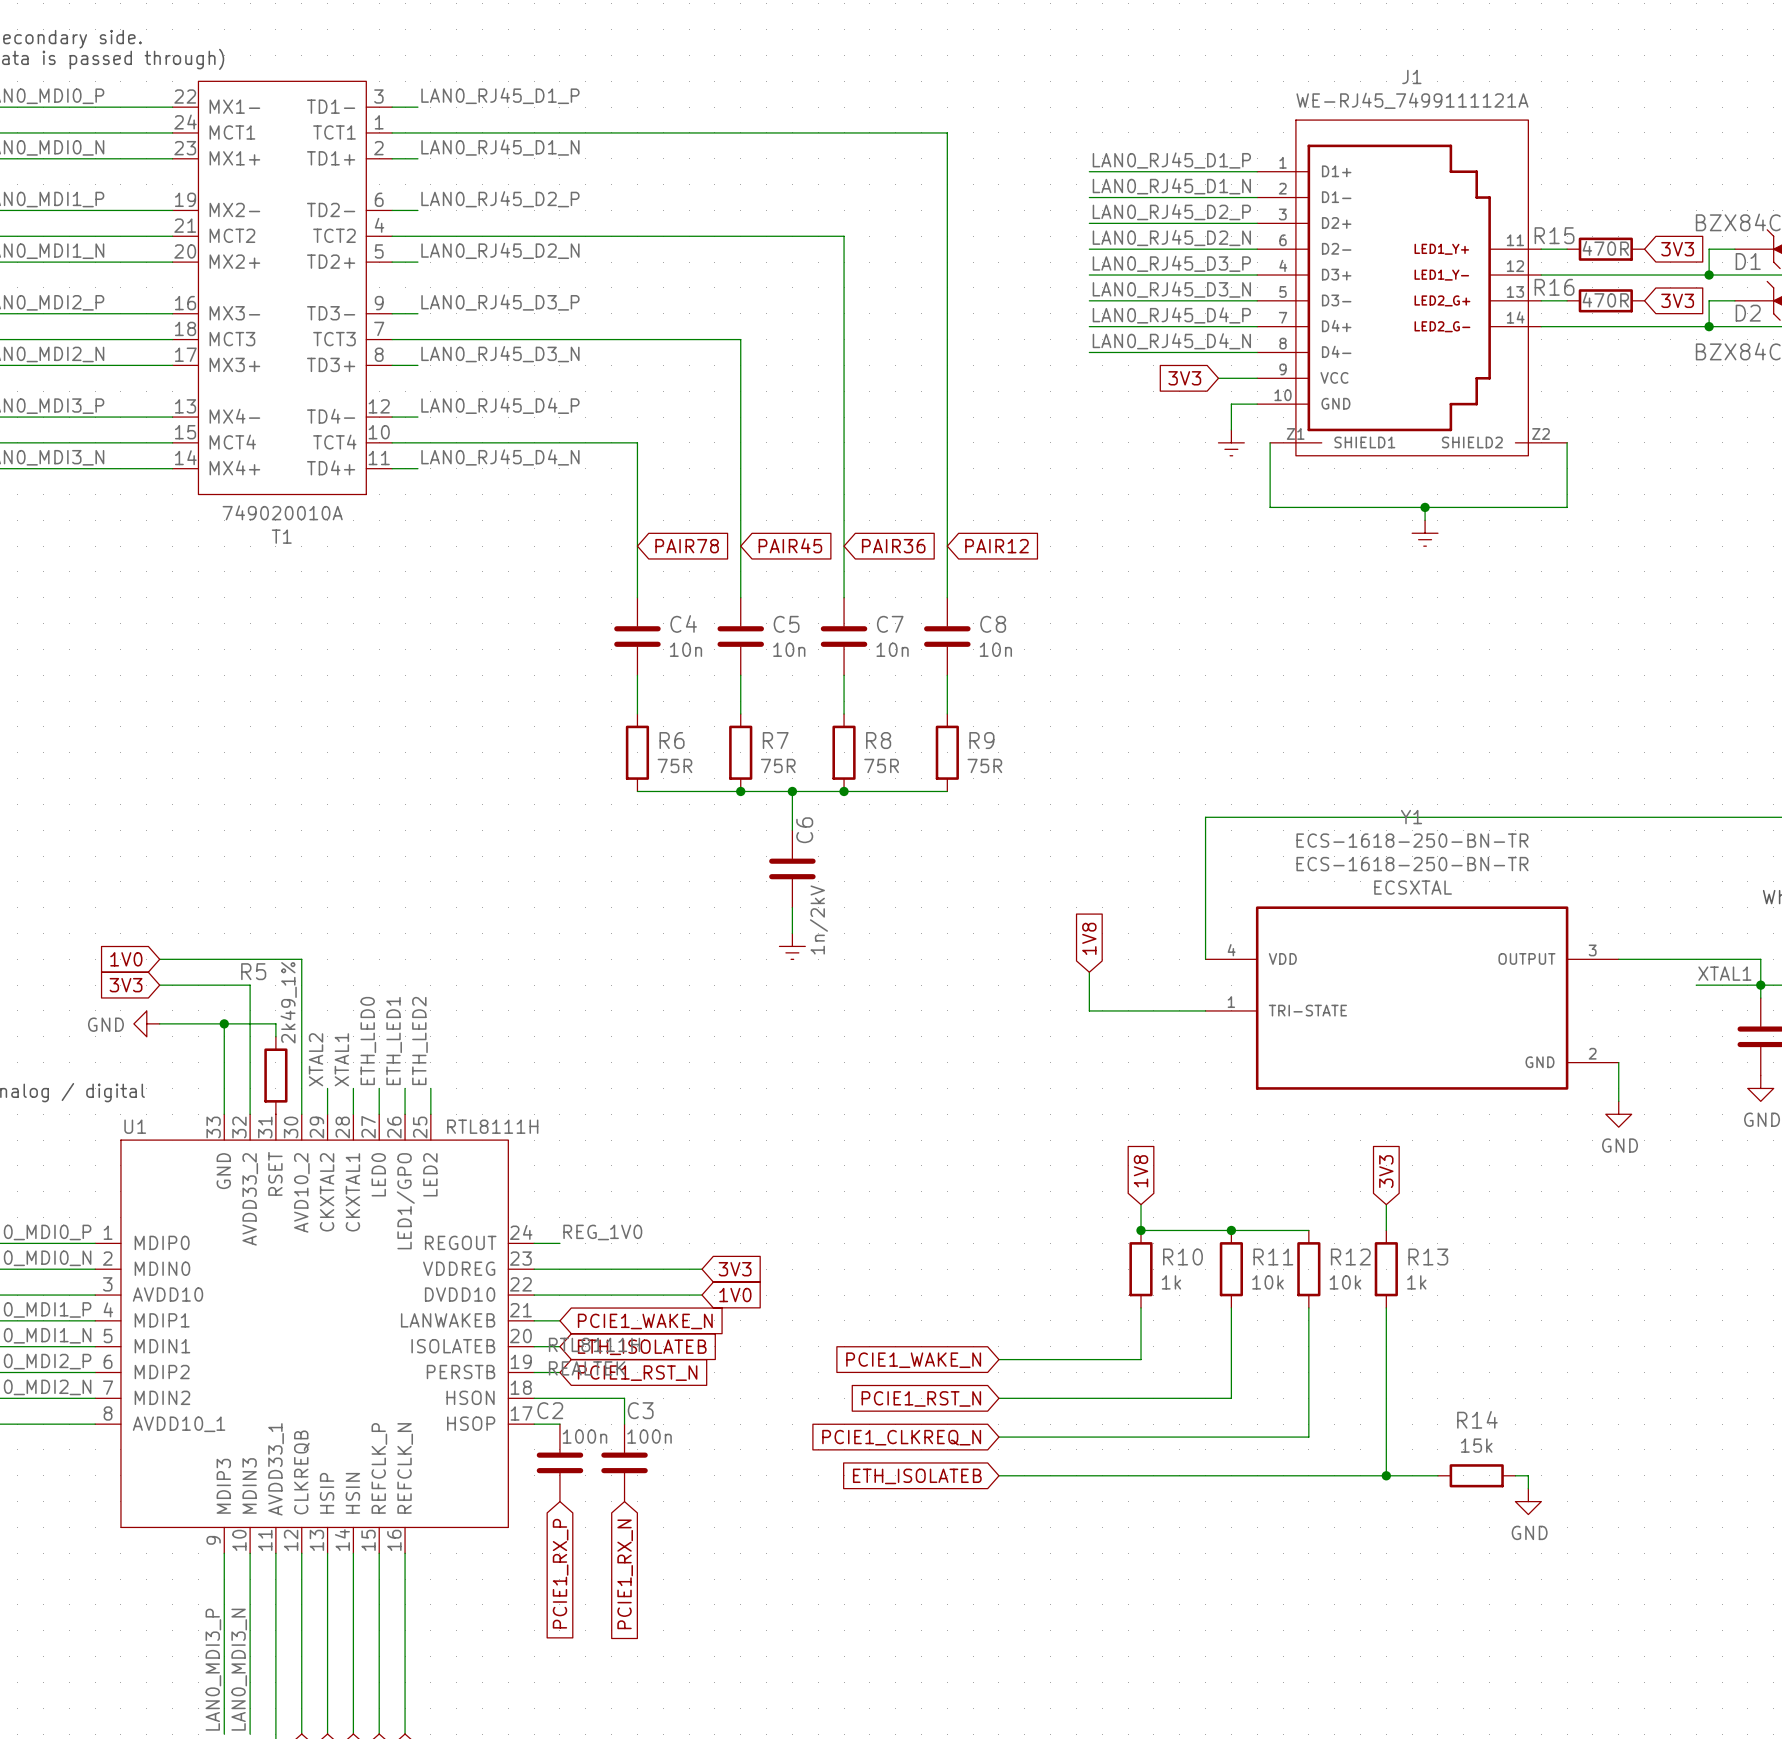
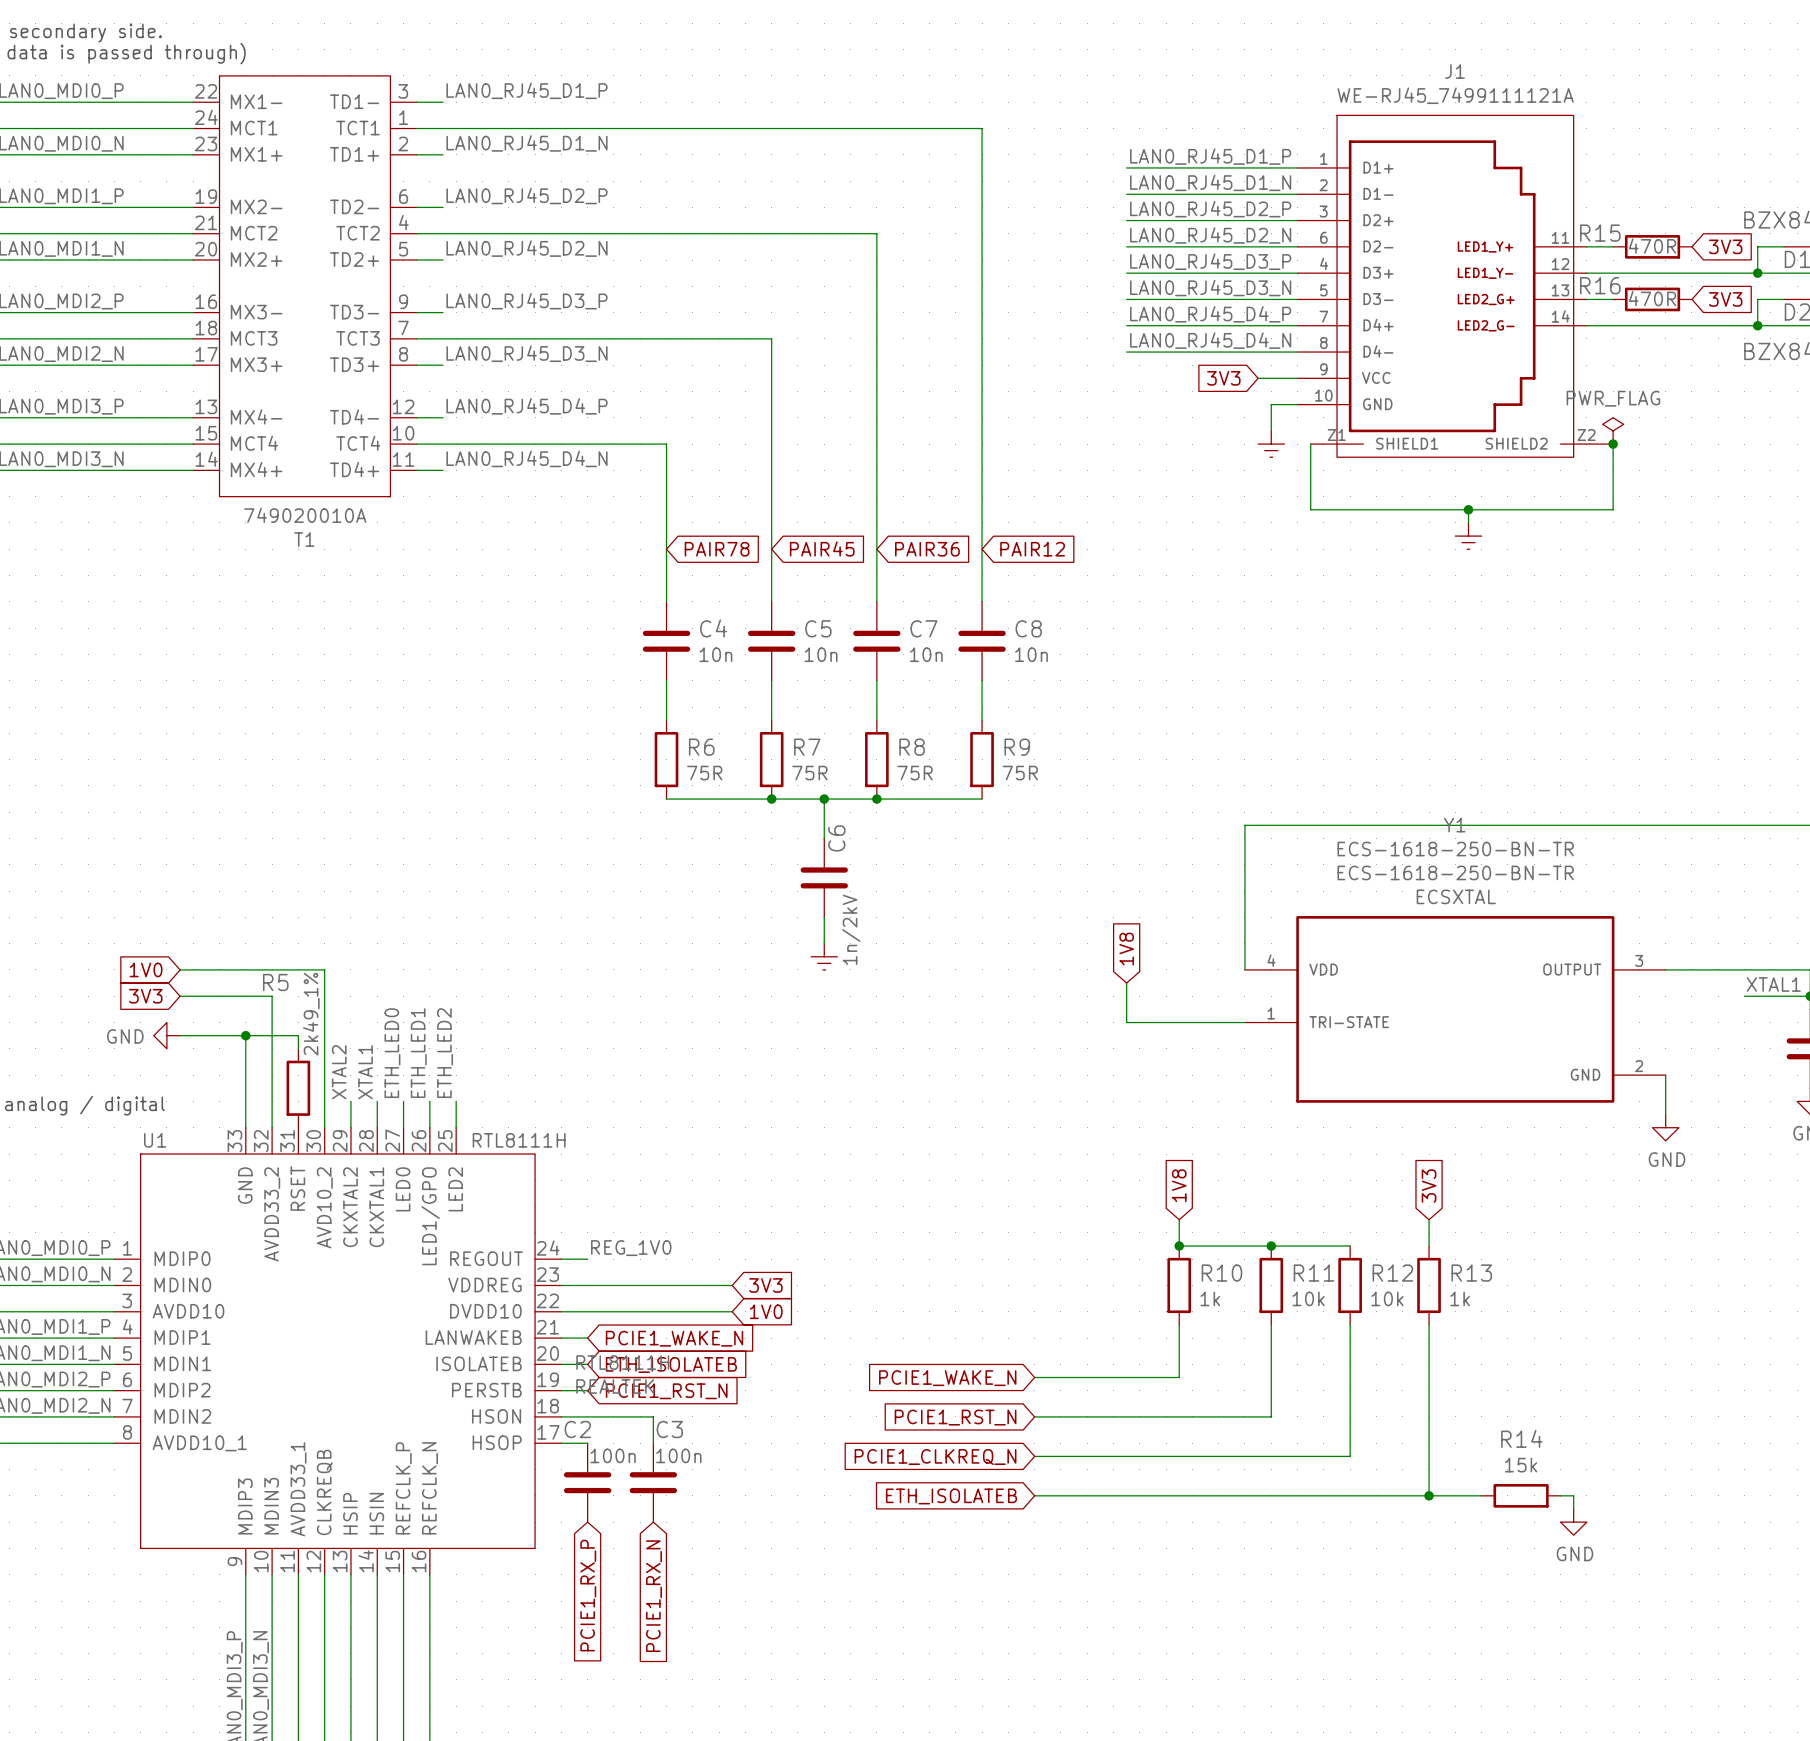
power symbol: none -> PWR_FLAG (1613, 430)
junction: none -> (1613, 444)

